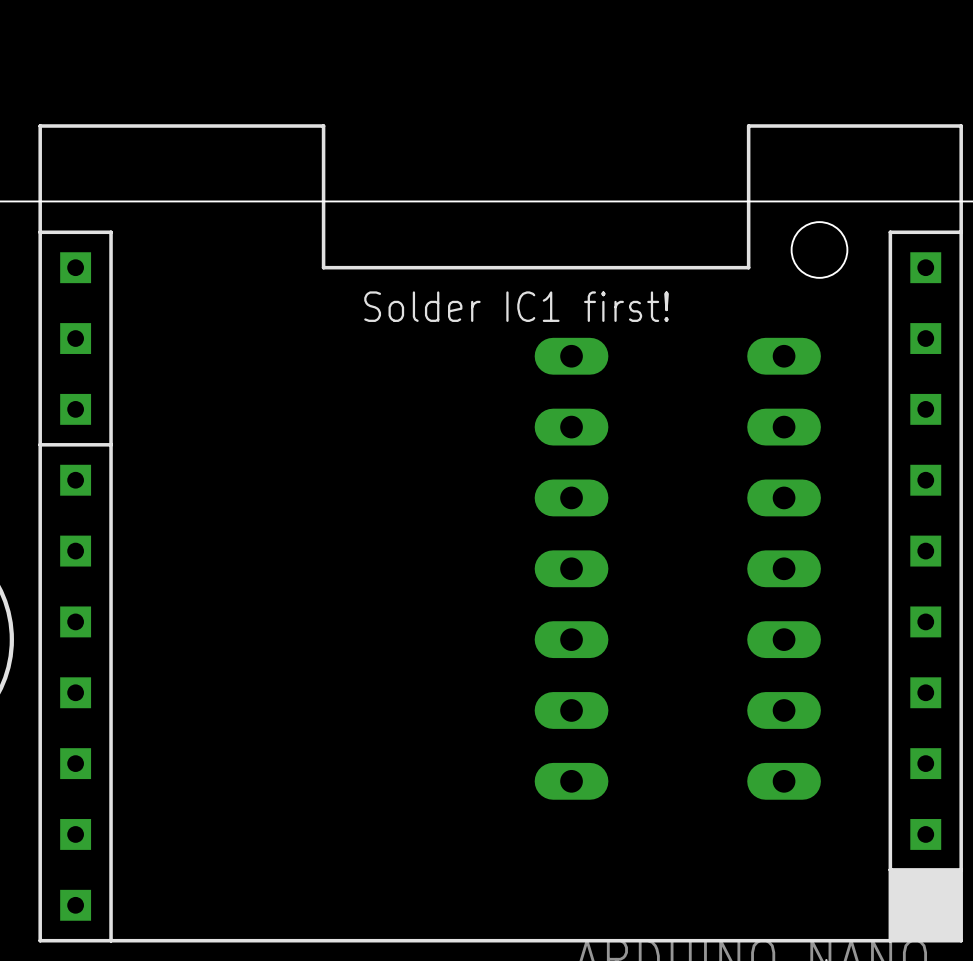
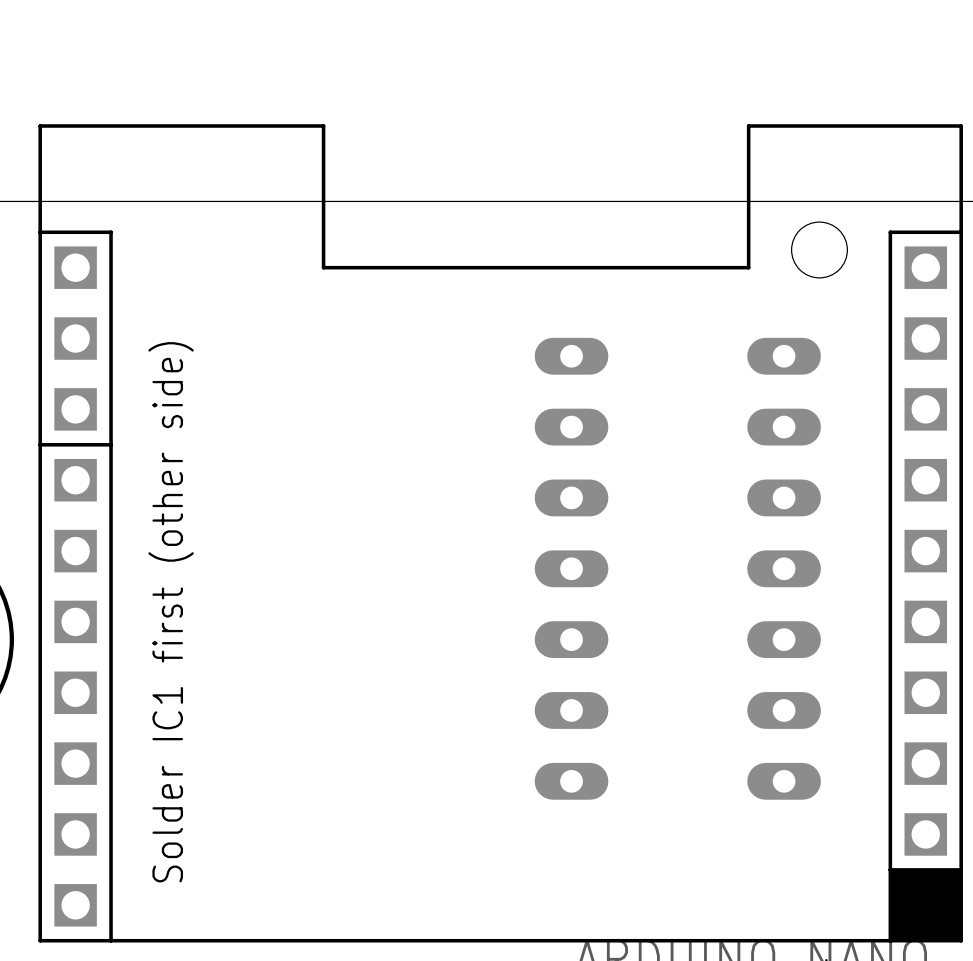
part footprint: [38, 124, 963, 943] -> [38, 124, 963, 943]
text: Solder IC1 first! (516, 306) -> none
text: none -> Solder IC1 first (other side) (171, 612)

